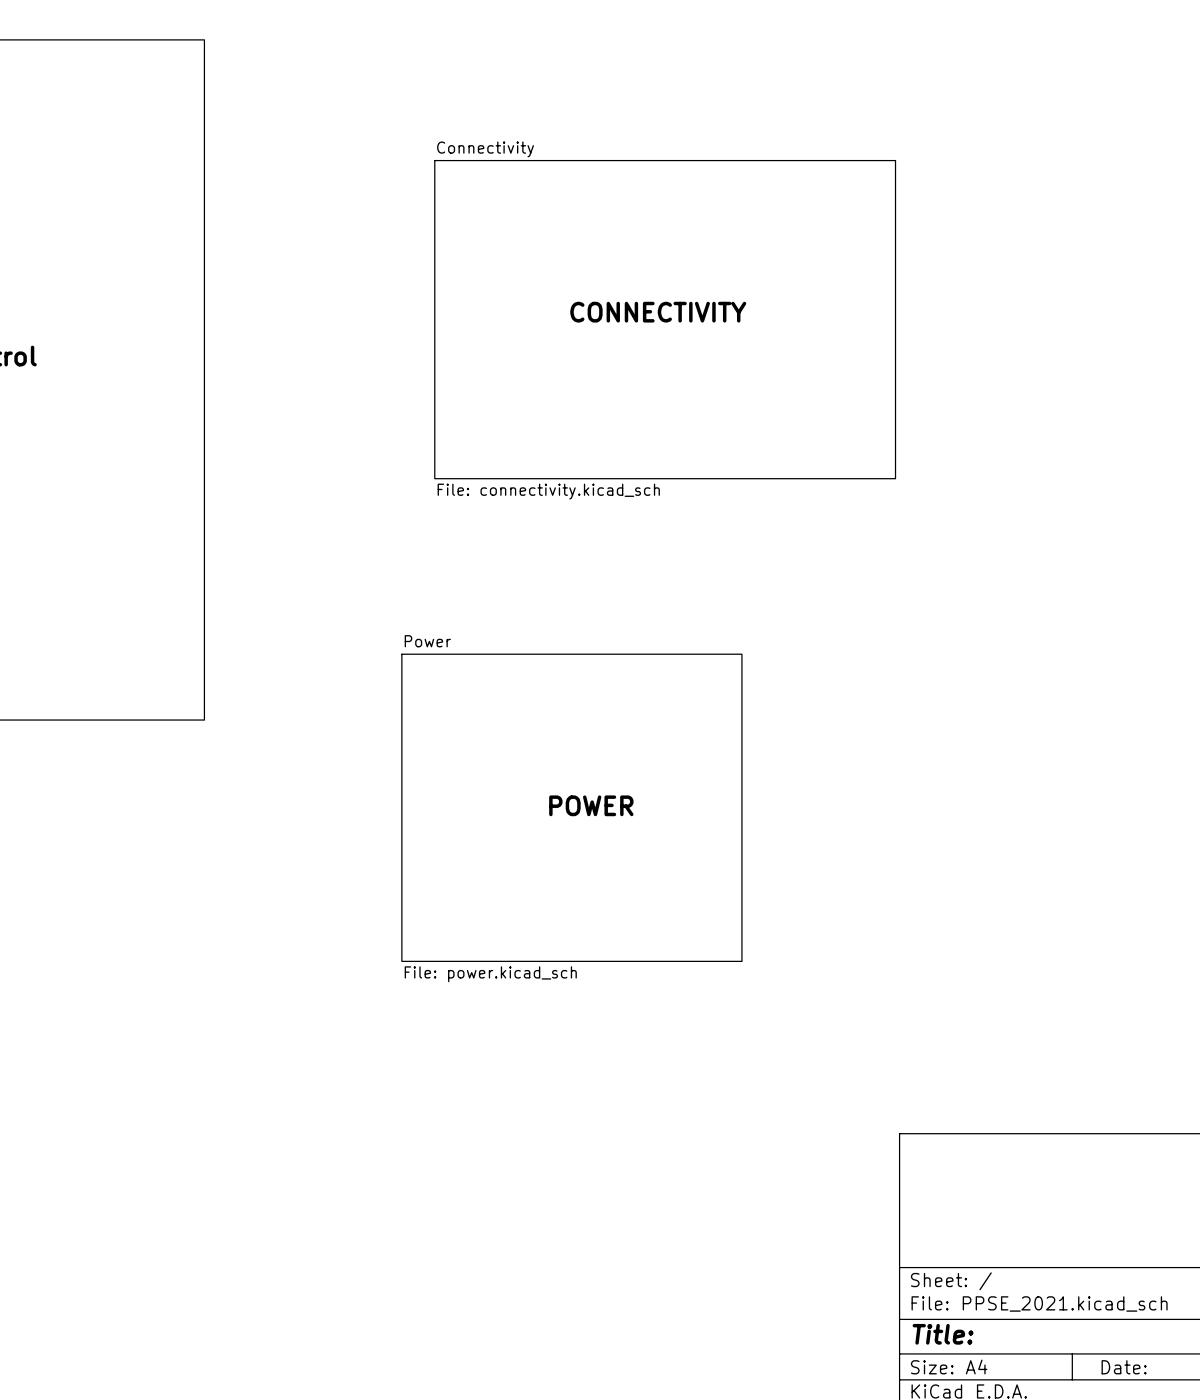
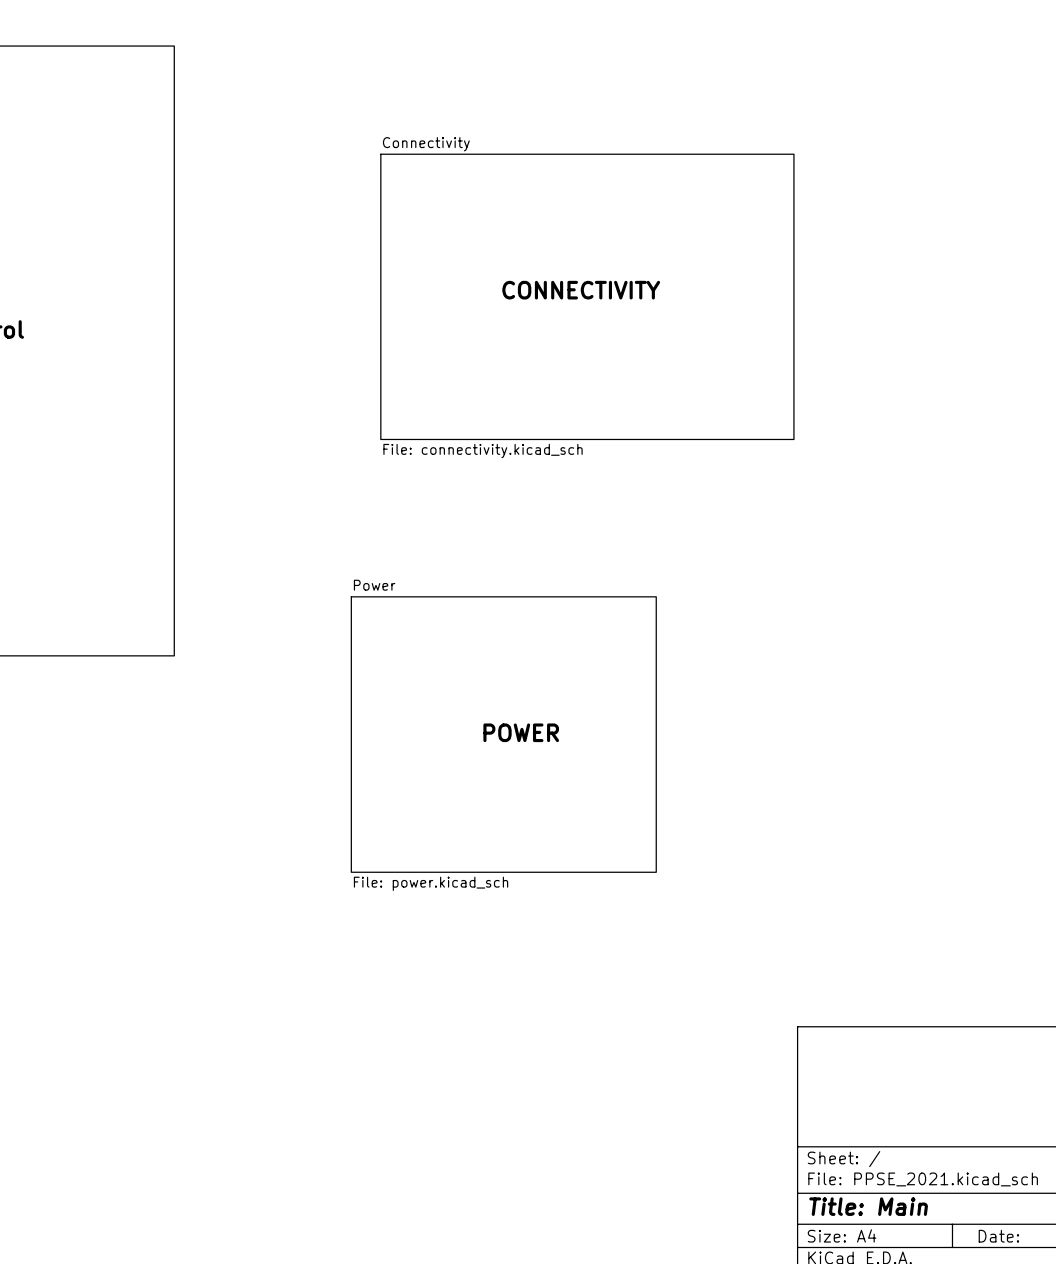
title block: Title: (943, 1334) -> Title: Main (868, 1206)

